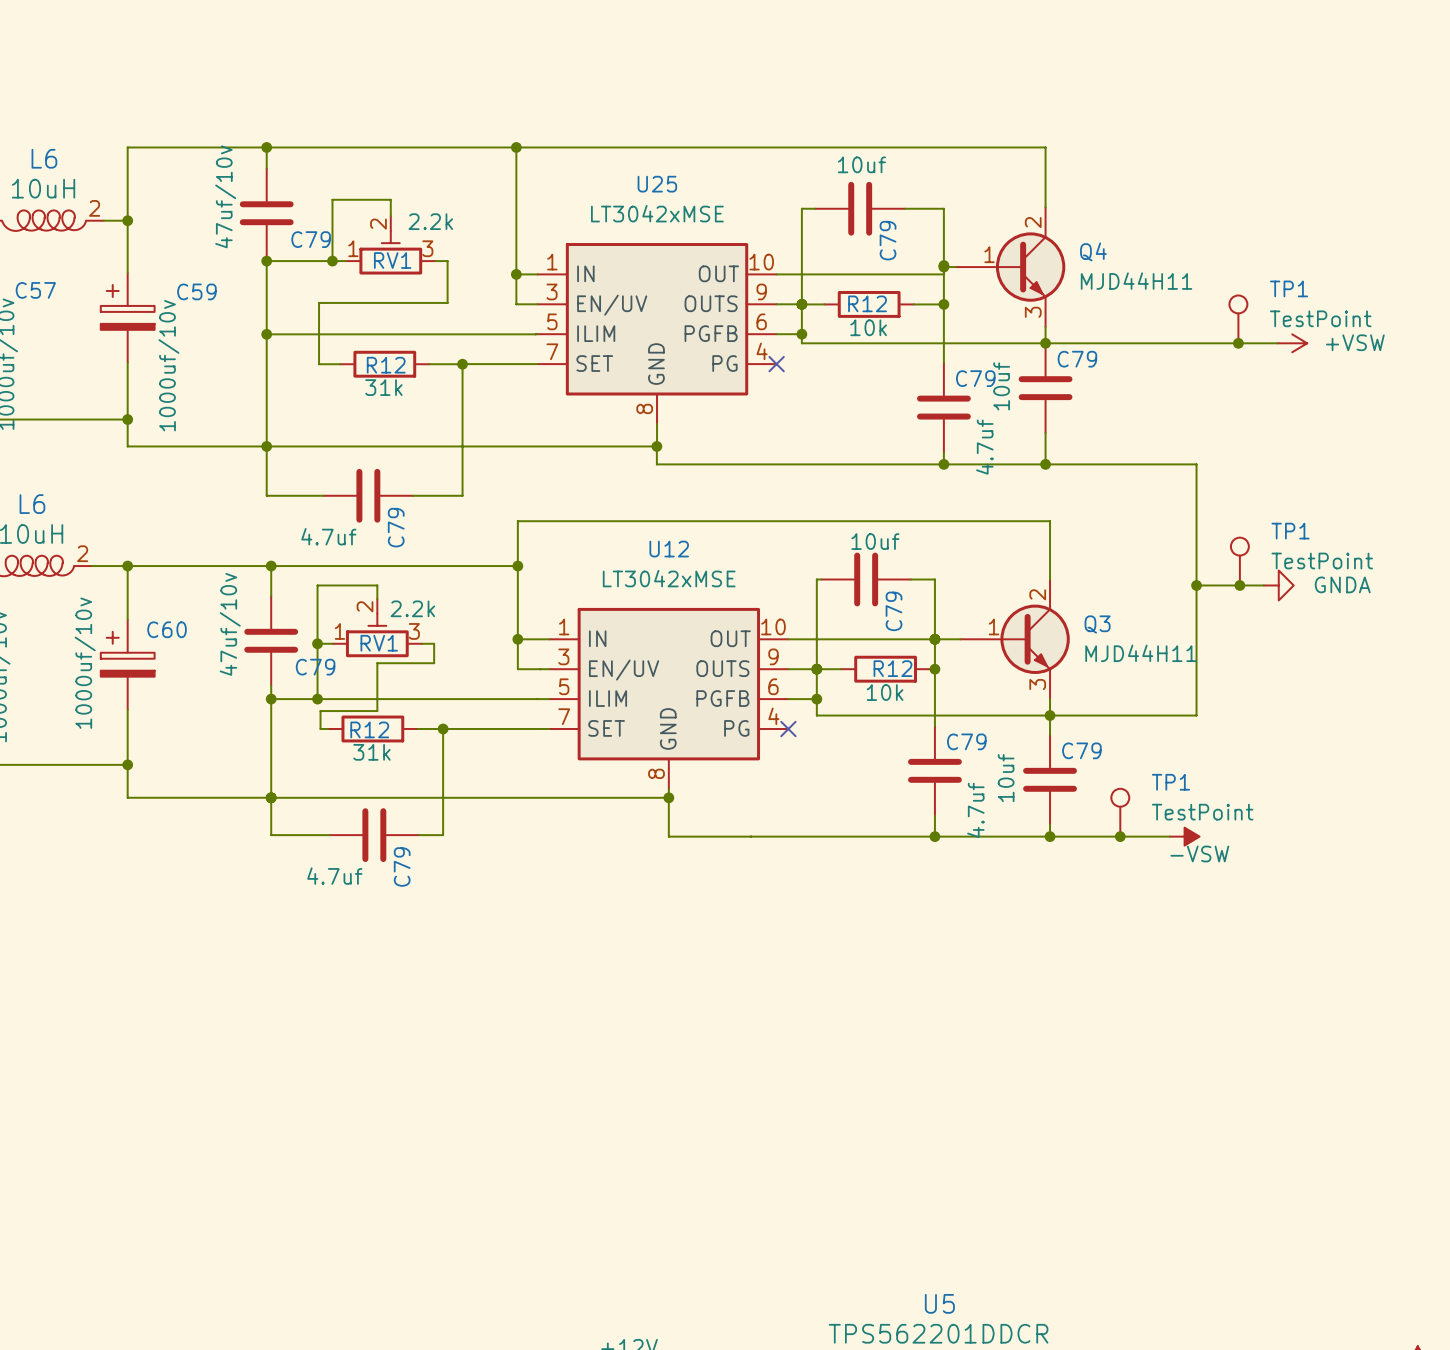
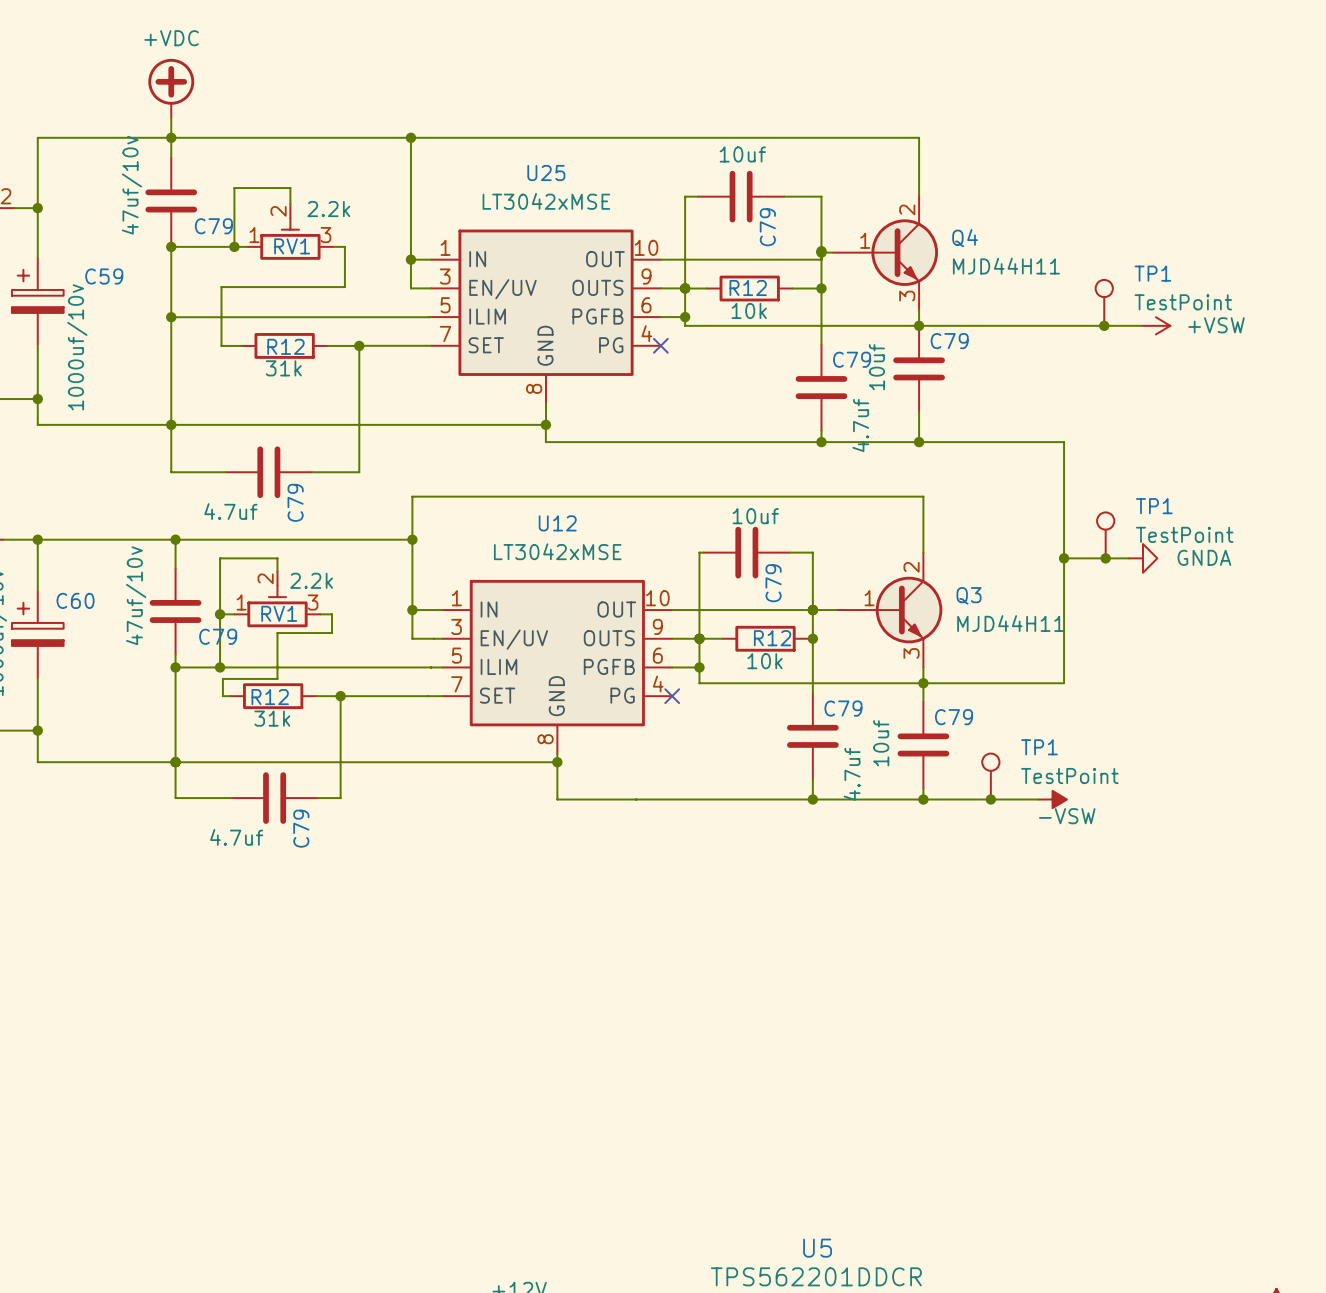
power symbol: none -> +VDC (171, 88)
wire: none -> (171, 117) (171, 137)

